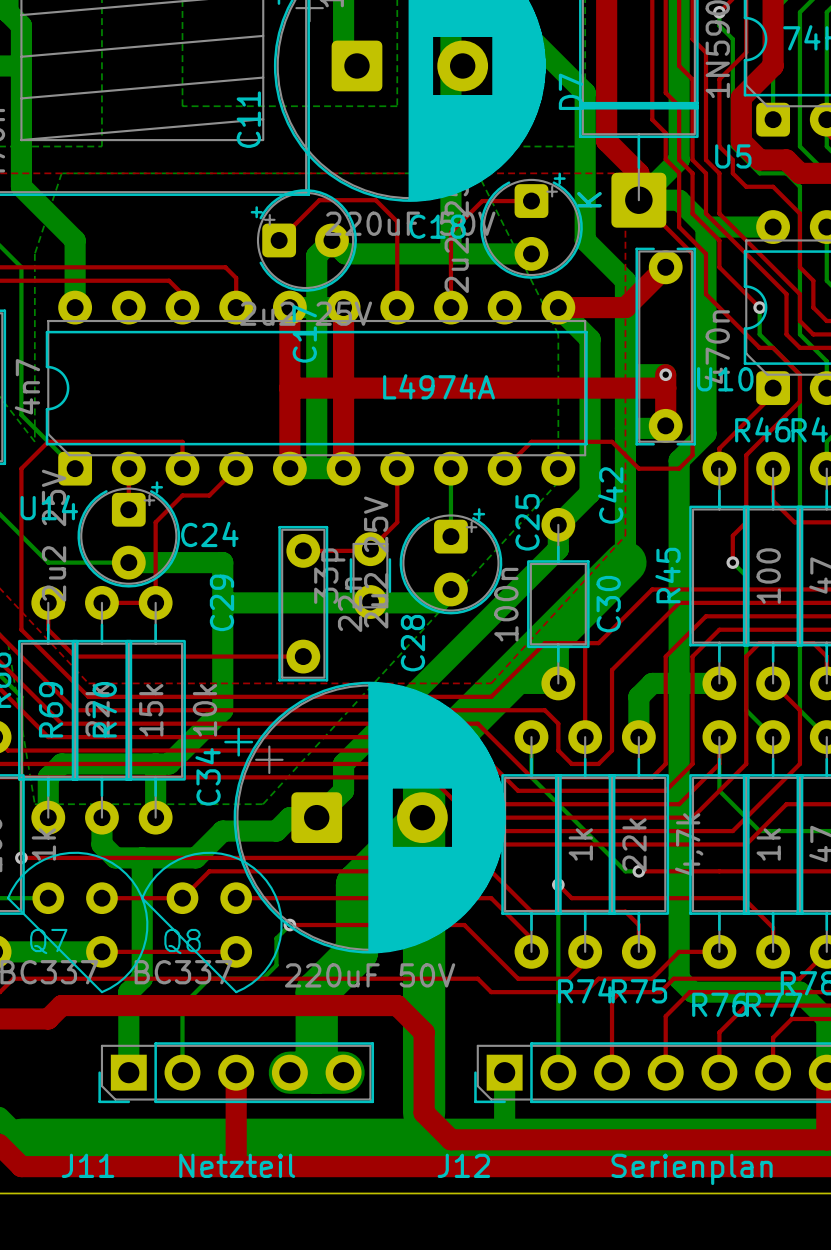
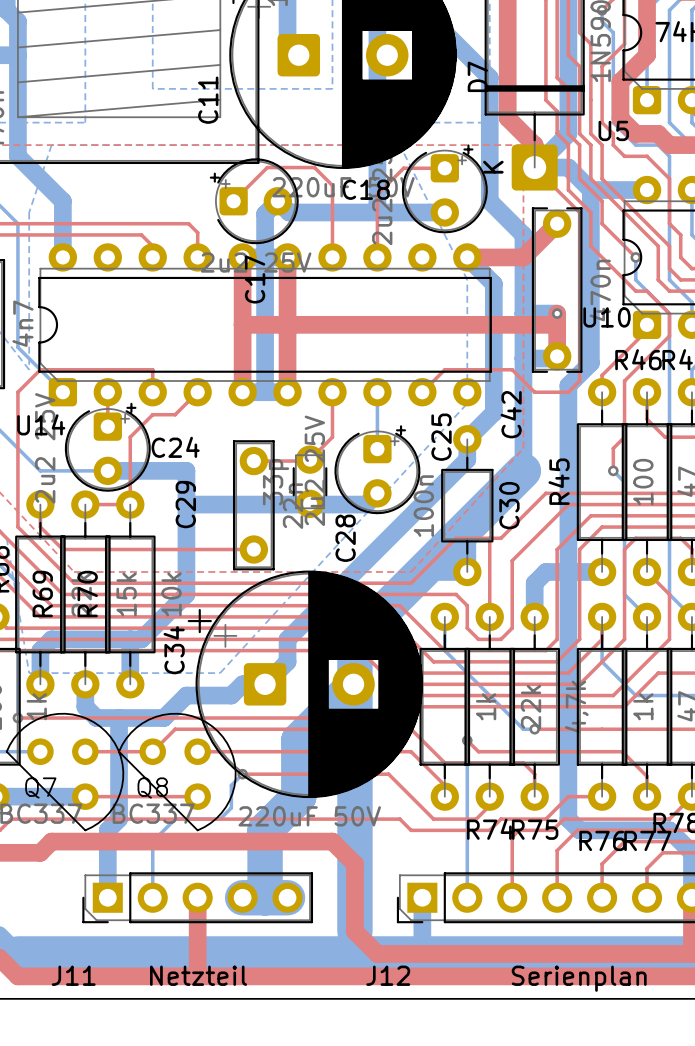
U14 value: L4974A (439, 386) -> none

